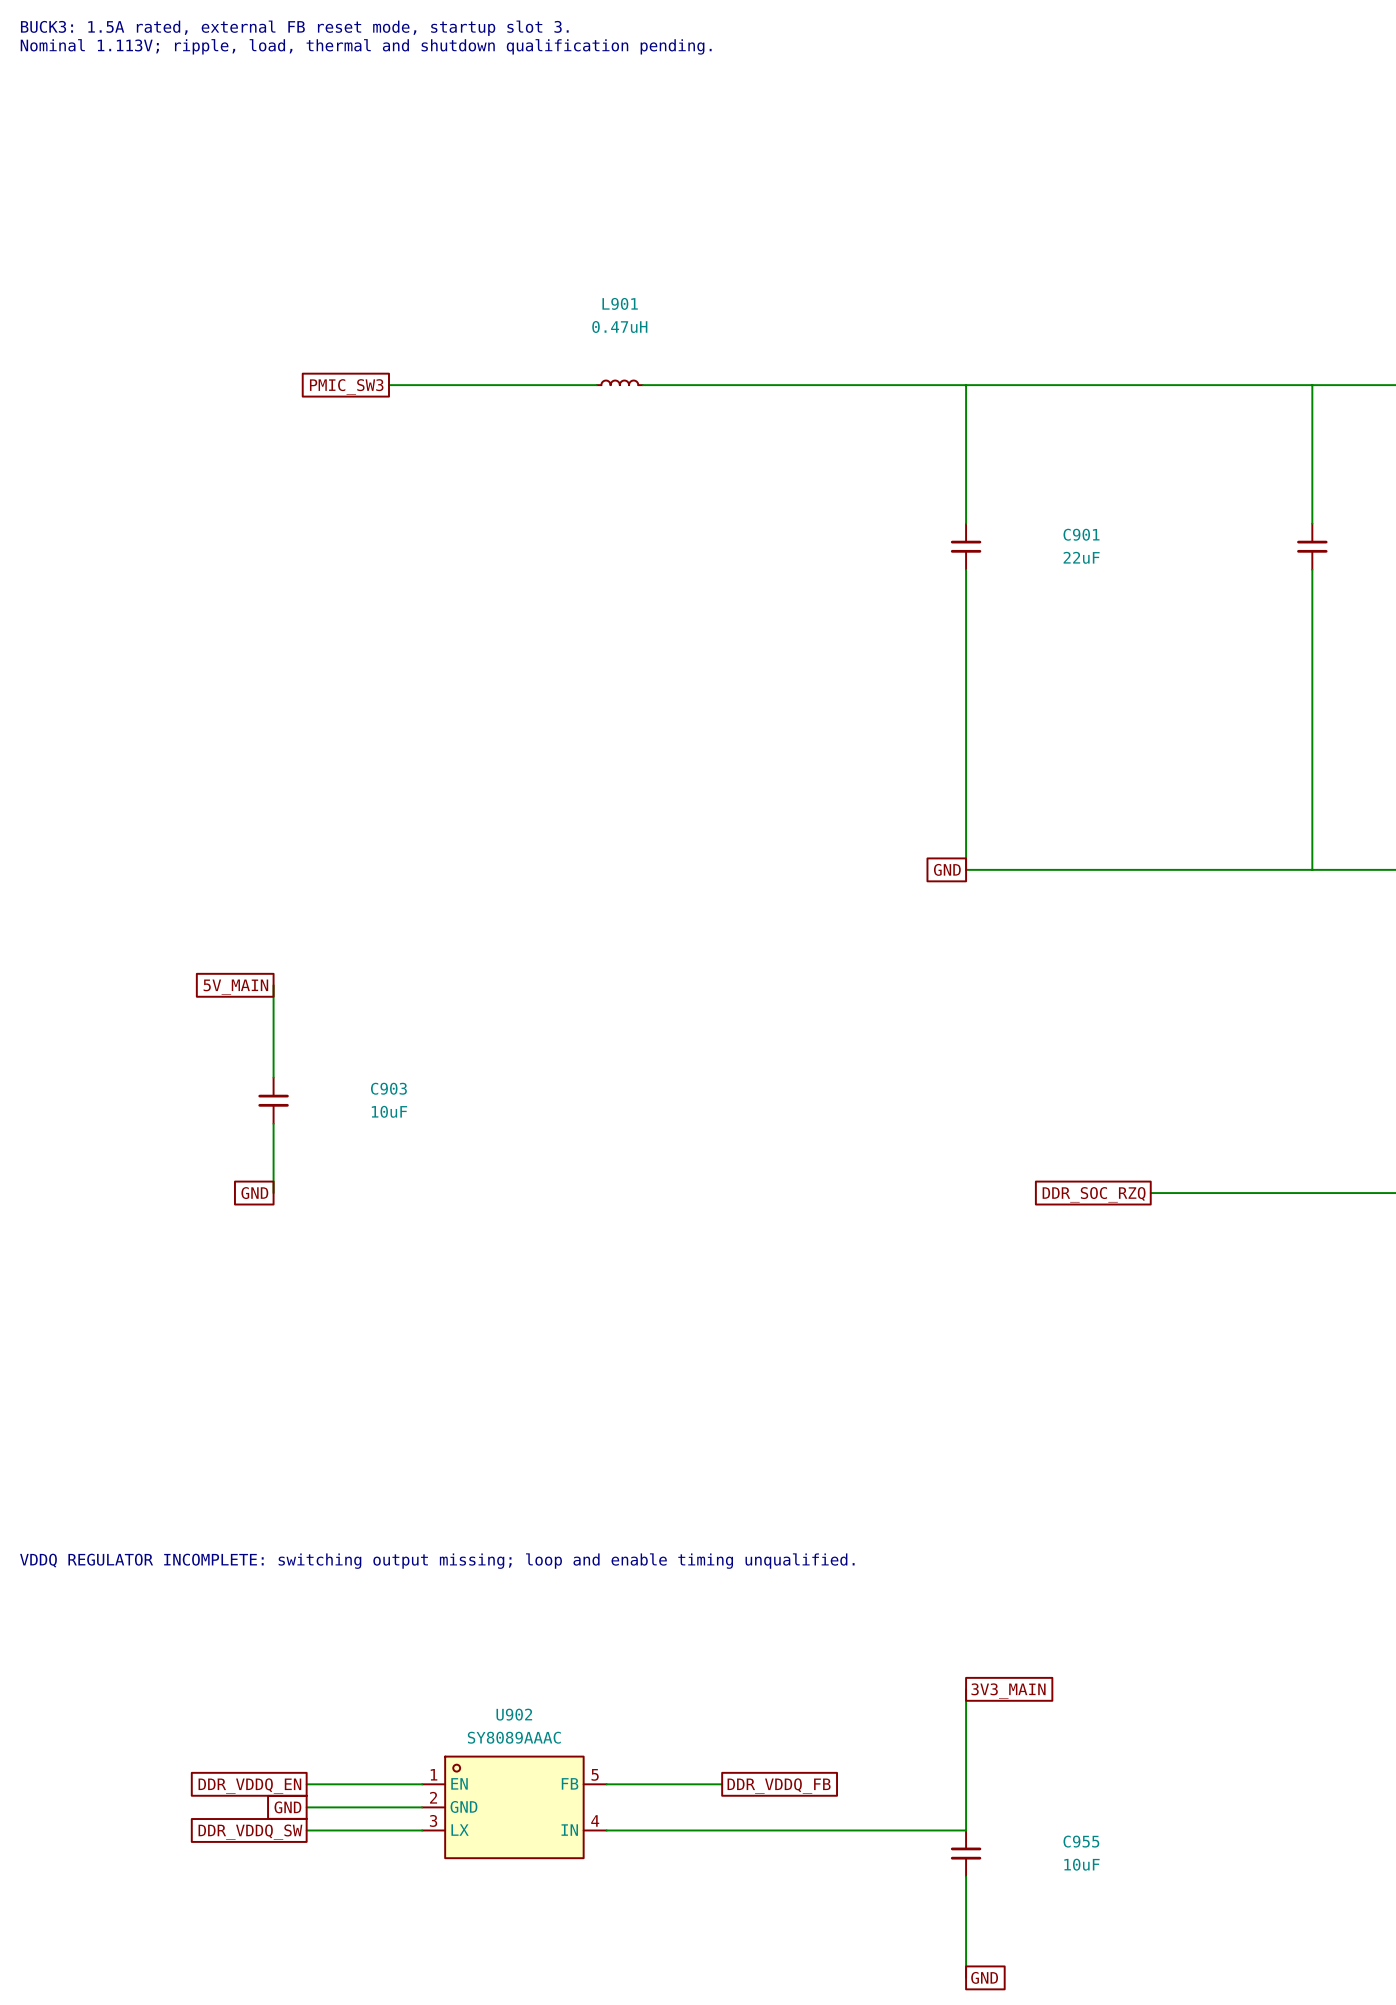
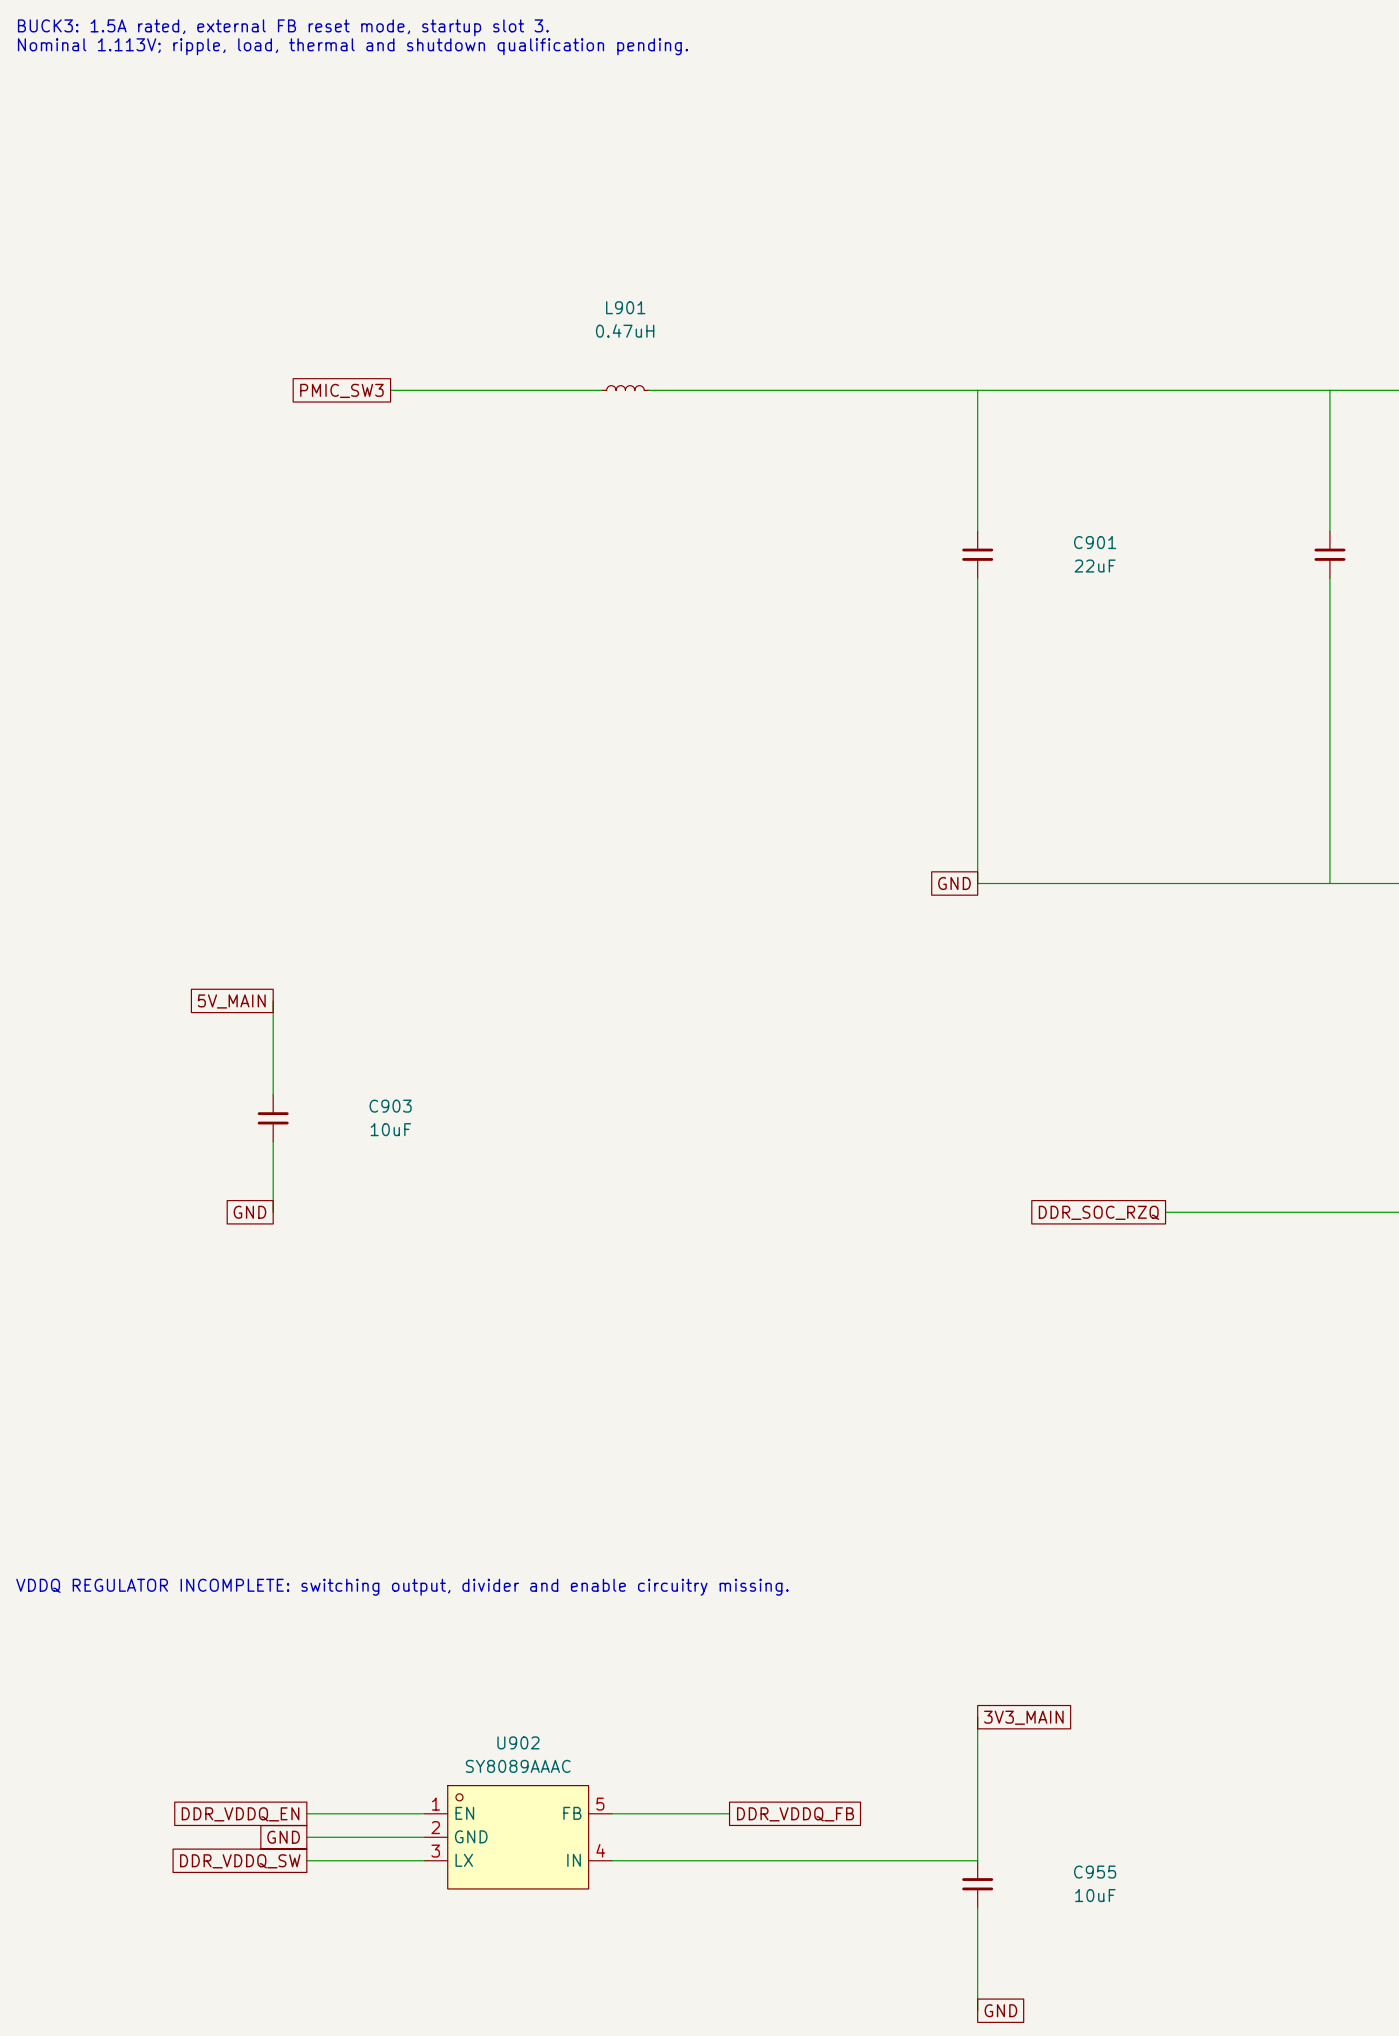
text: VDDQ REGULATOR INCOMPLETE: switching output missing; loop and enable timing unqualified. (437, 1561) -> VDDQ REGULATOR INCOMPLETE: switching output, divider and enable circuitry missing. (402, 1587)

